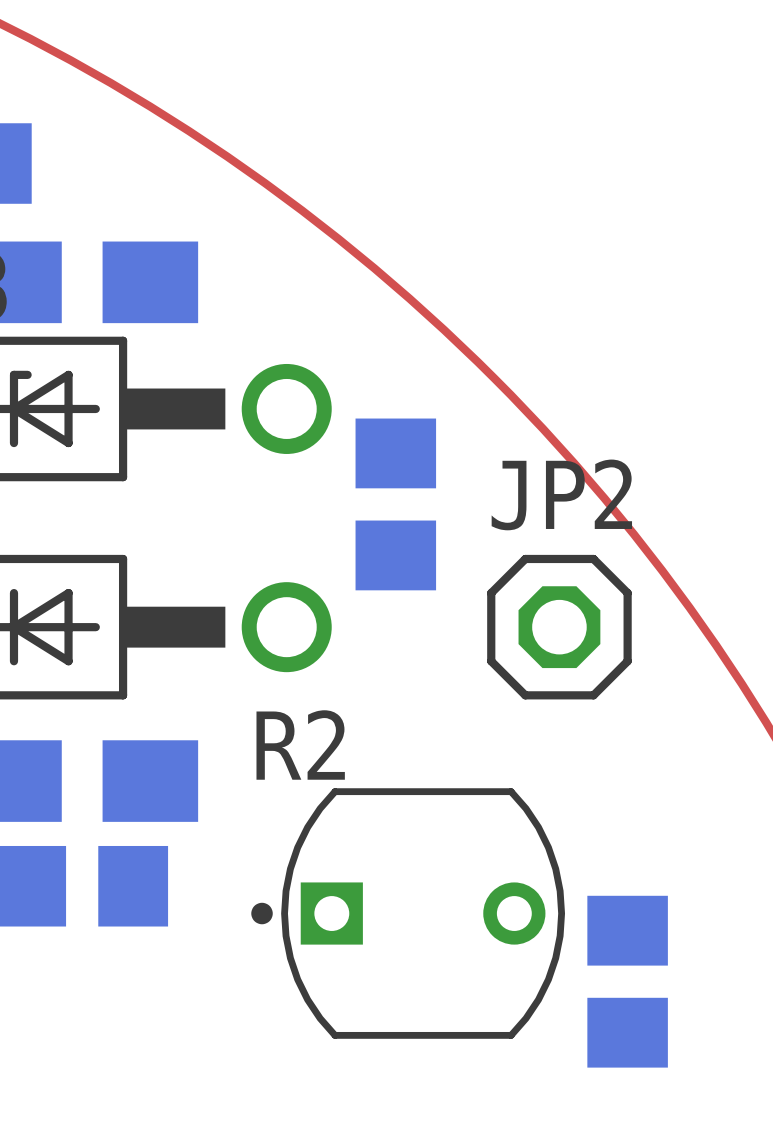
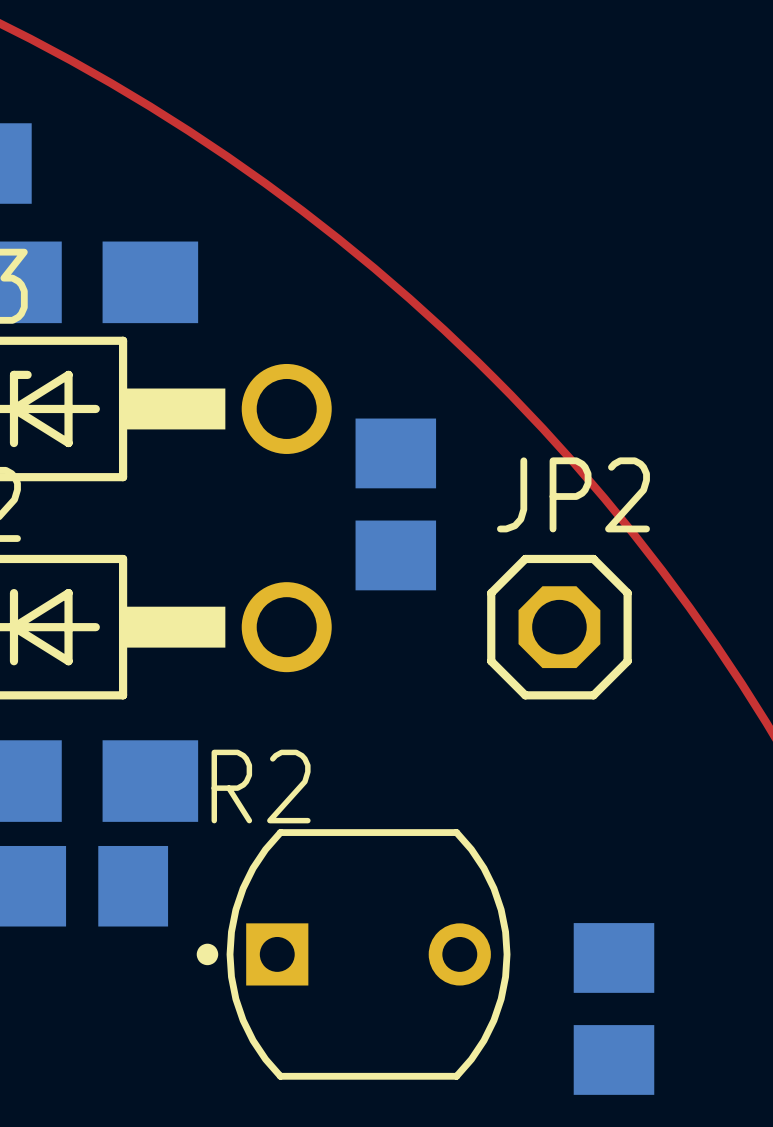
R2 position: (408, 913) -> (353, 954)
part position: (627, 981) -> (613, 1008)

